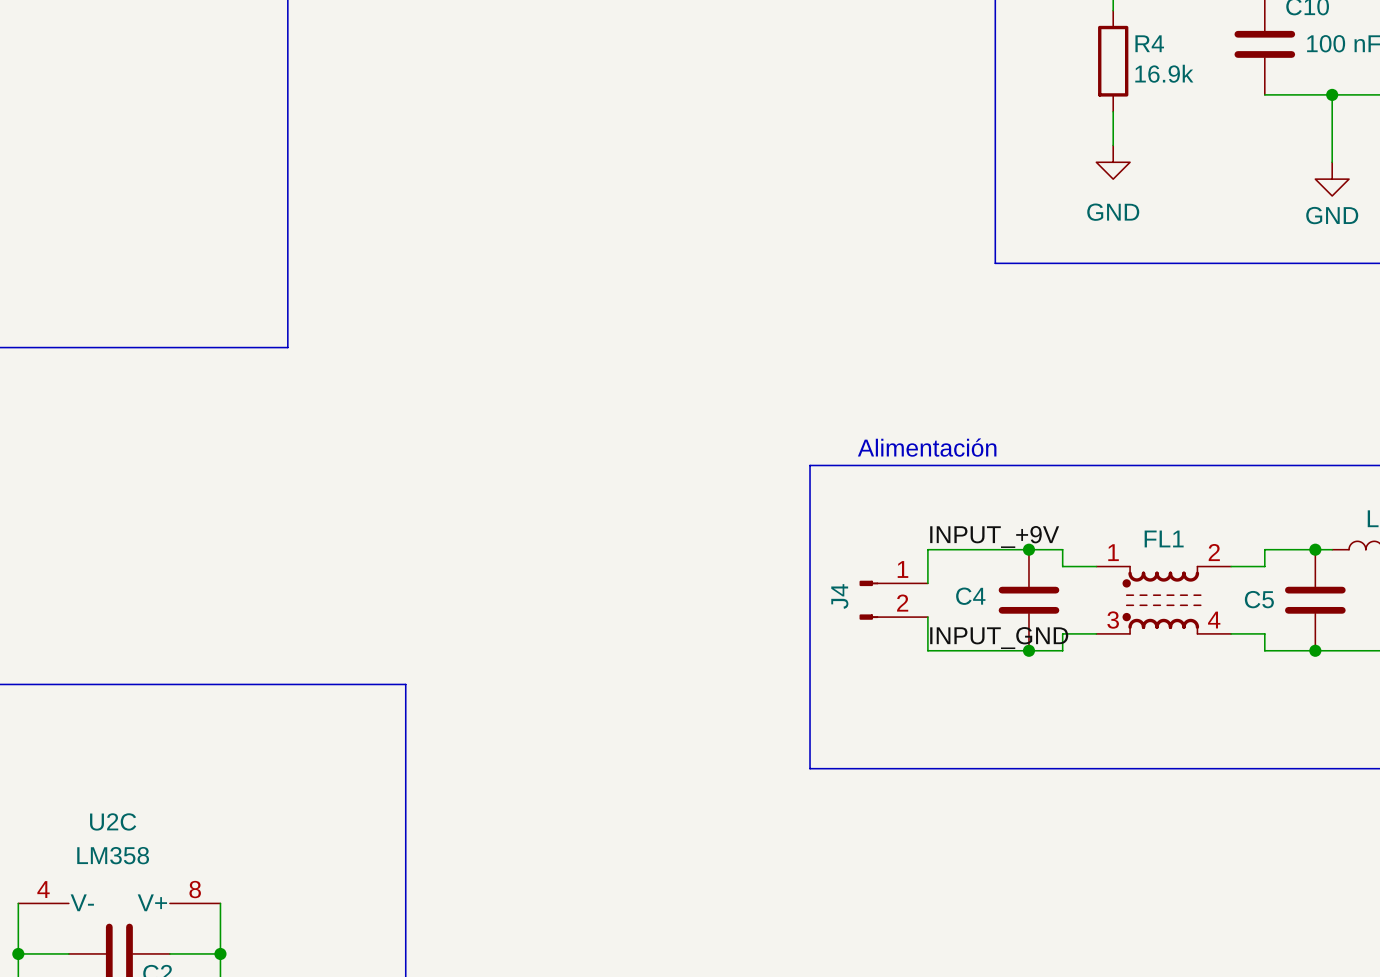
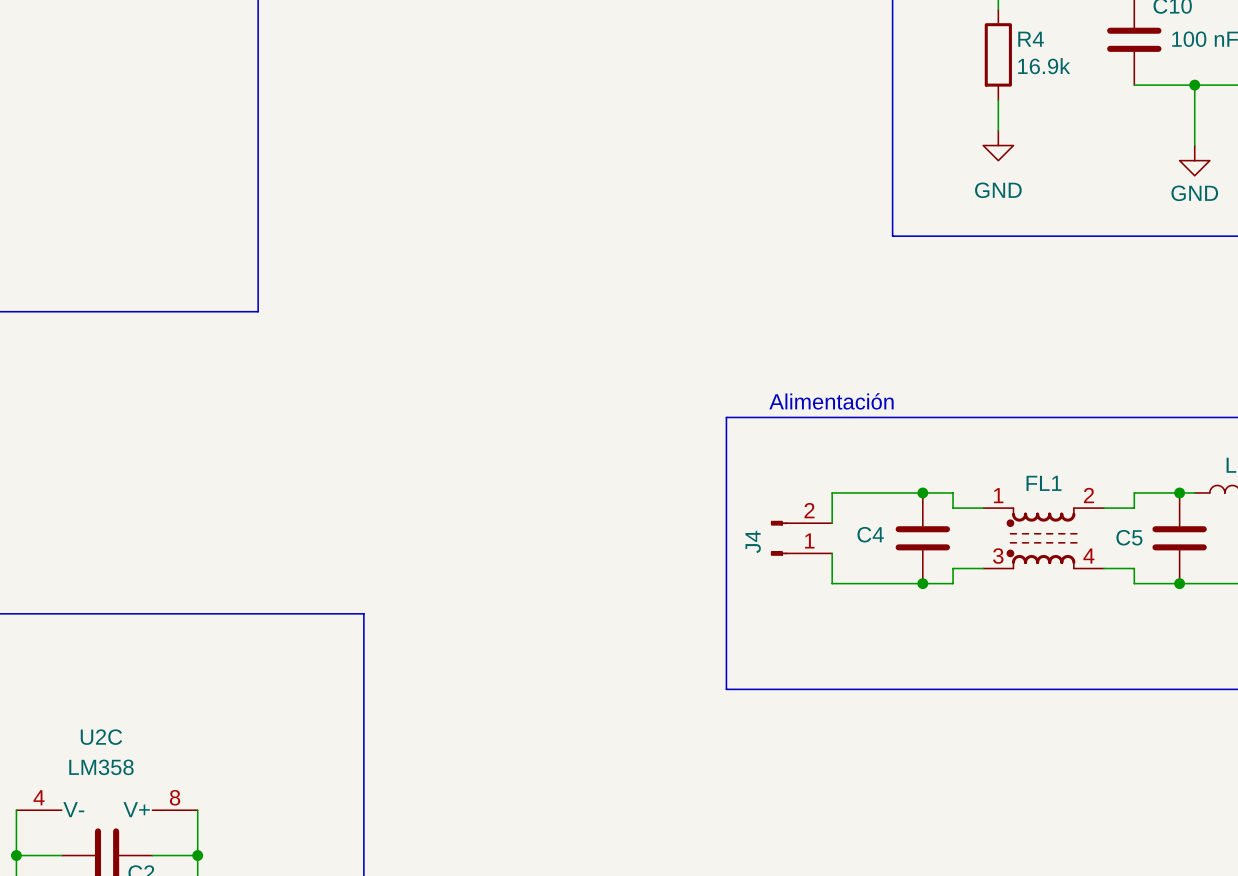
label: INPUT_+9V (994, 536) -> none
J4 flip: as is (868, 600) -> up-down (779, 538)
label: INPUT_GND (999, 638) -> none

